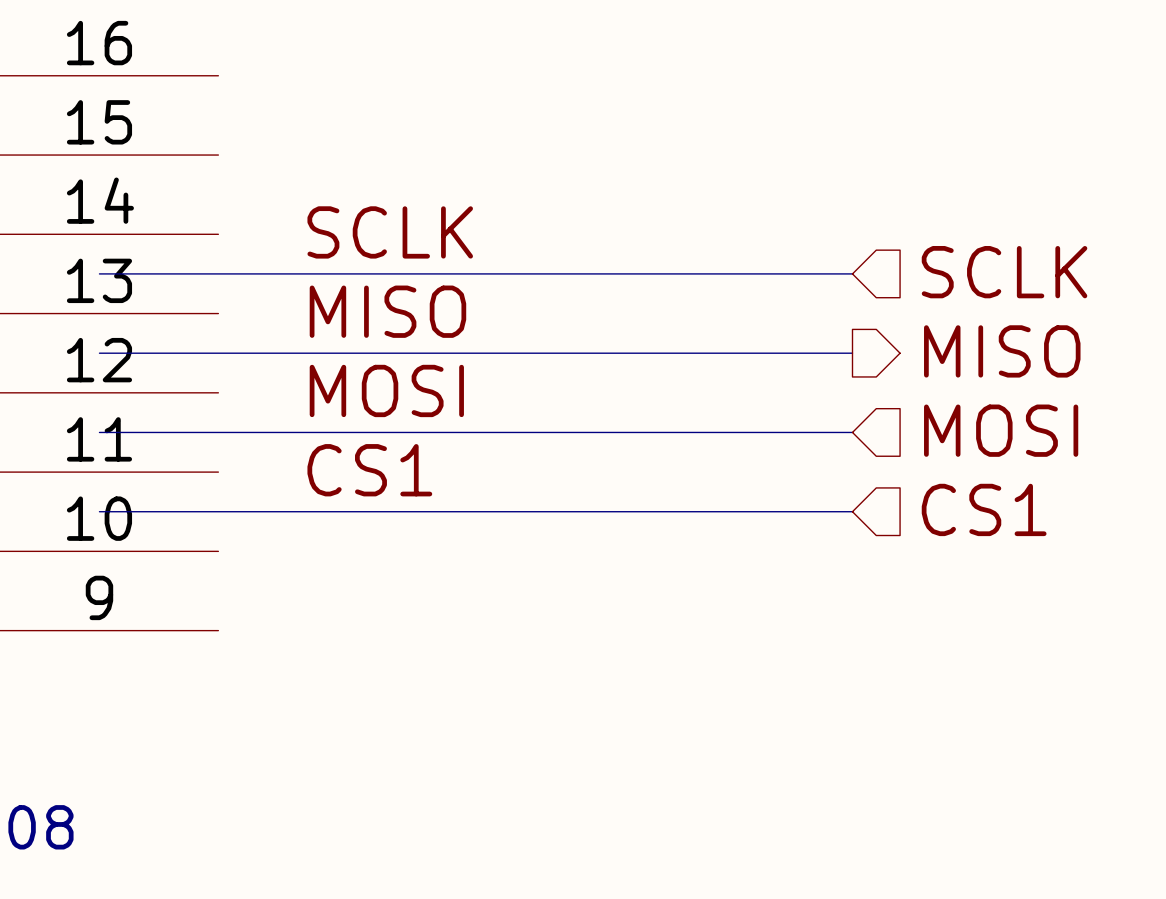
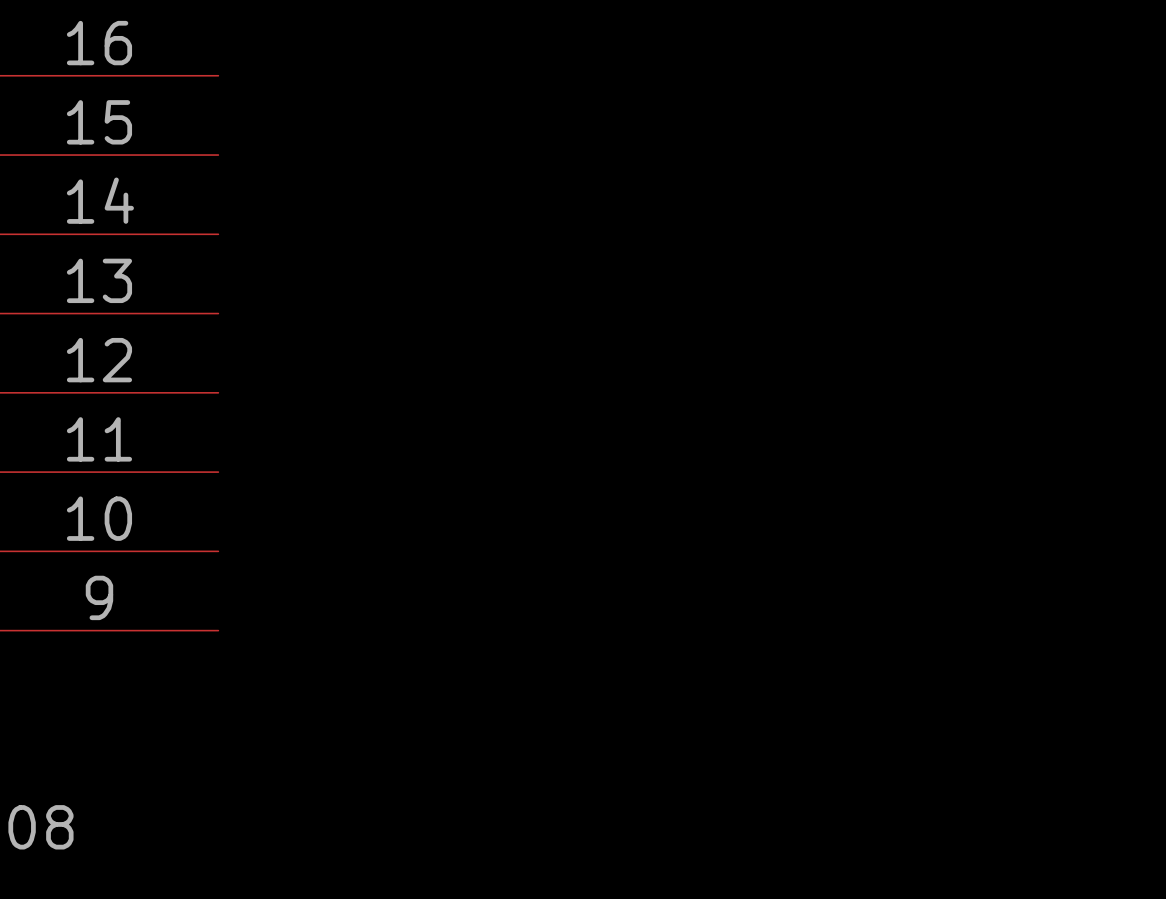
label: SCLK (390, 232) -> none
hierarchical label: SCLK (1004, 272) -> none
wire: (99, 273) (852, 273) -> none
label: MISO (387, 311) -> none
hierarchical label: MISO (1002, 351) -> none
wire: (99, 353) (852, 353) -> none
label: MOSI (386, 390) -> none
hierarchical label: MOSI (1001, 430) -> none
wire: (99, 432) (852, 432) -> none
label: CS1 (369, 470) -> none
hierarchical label: CS1 (984, 509) -> none
wire: (99, 511) (852, 511) -> none

